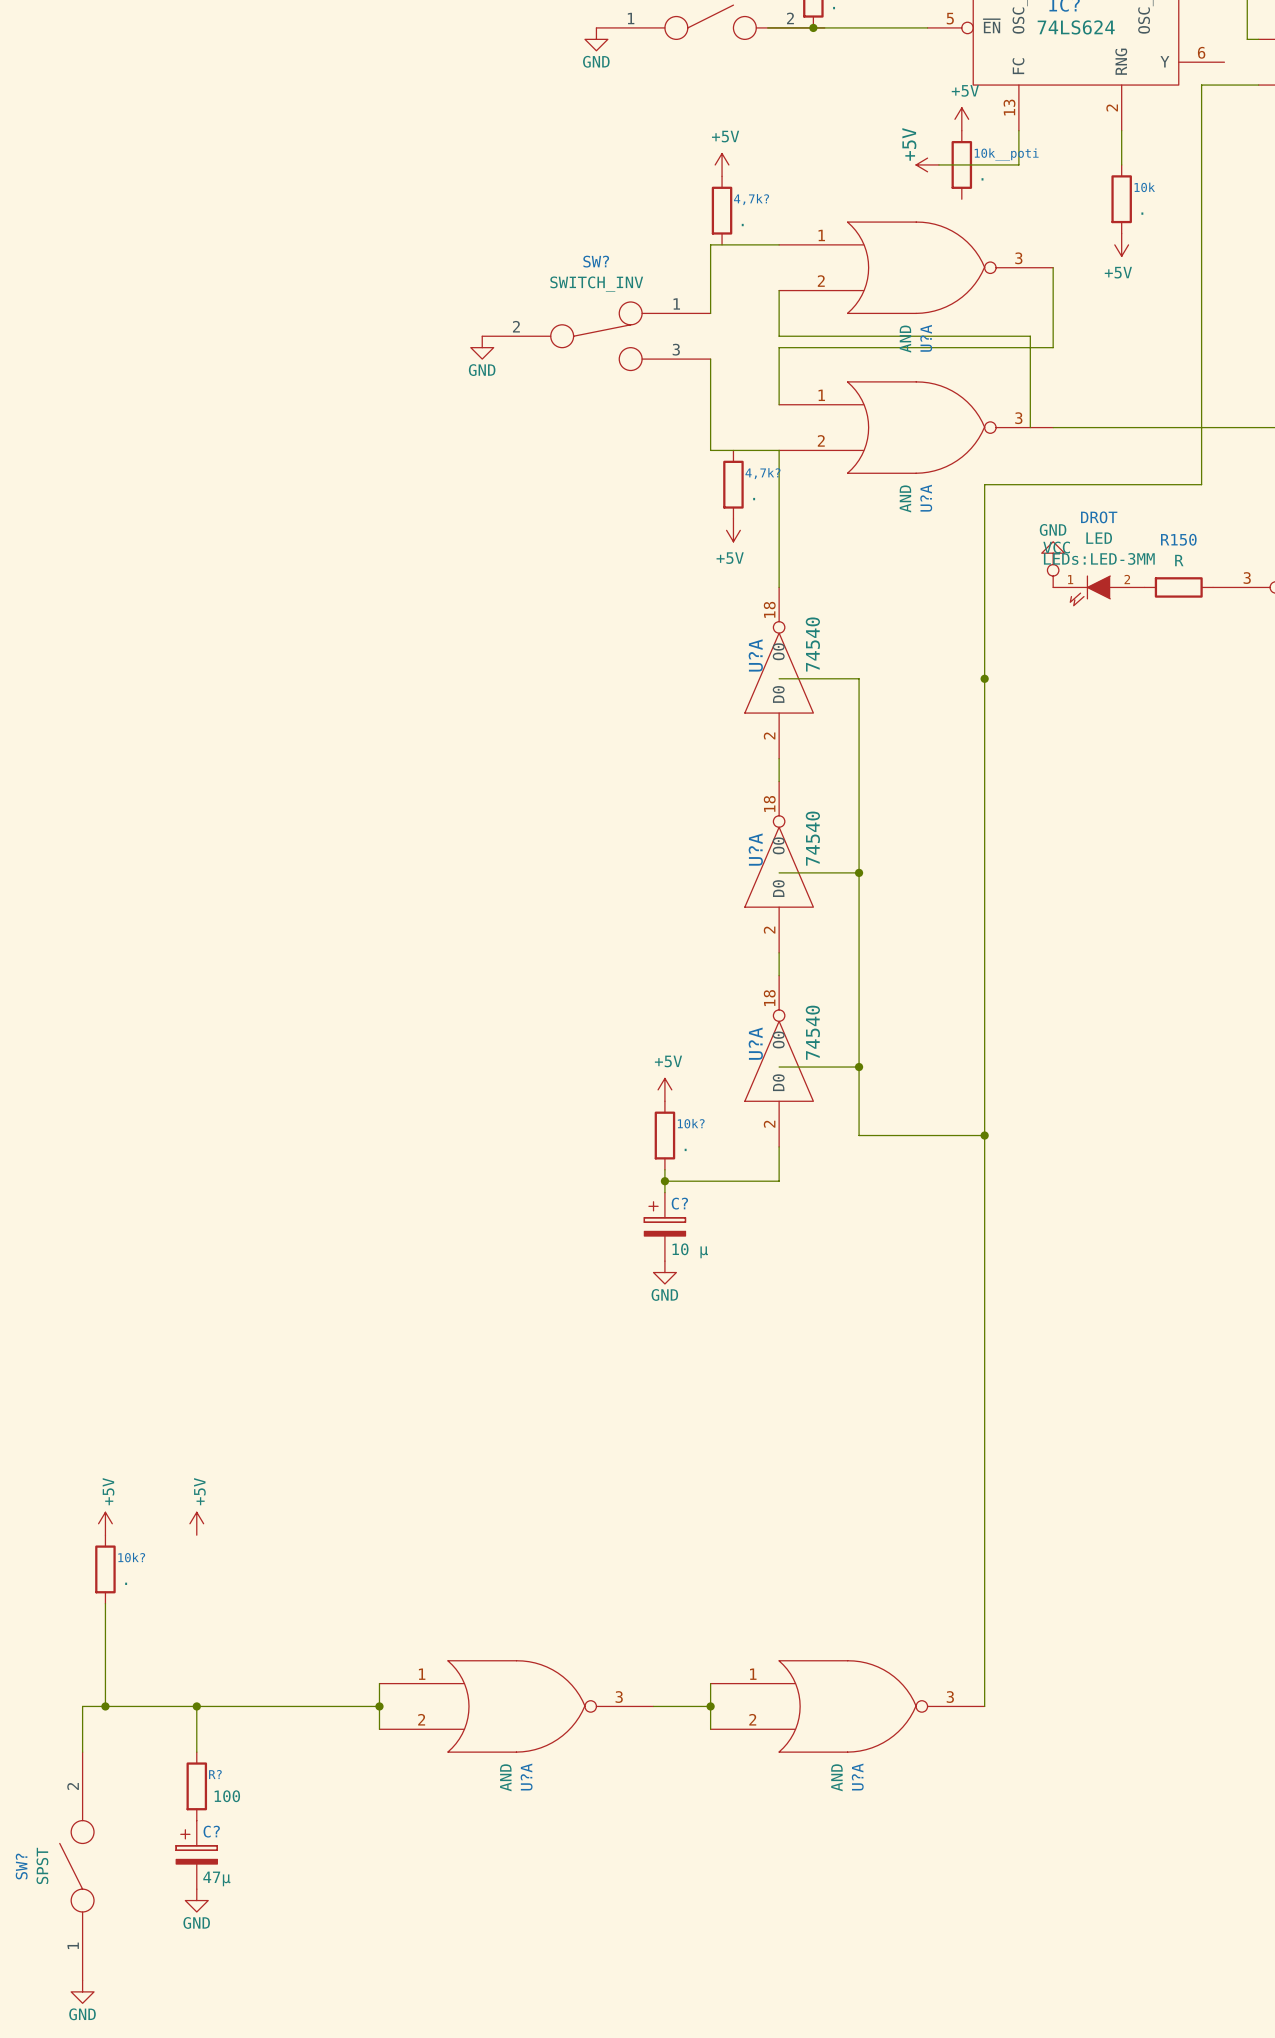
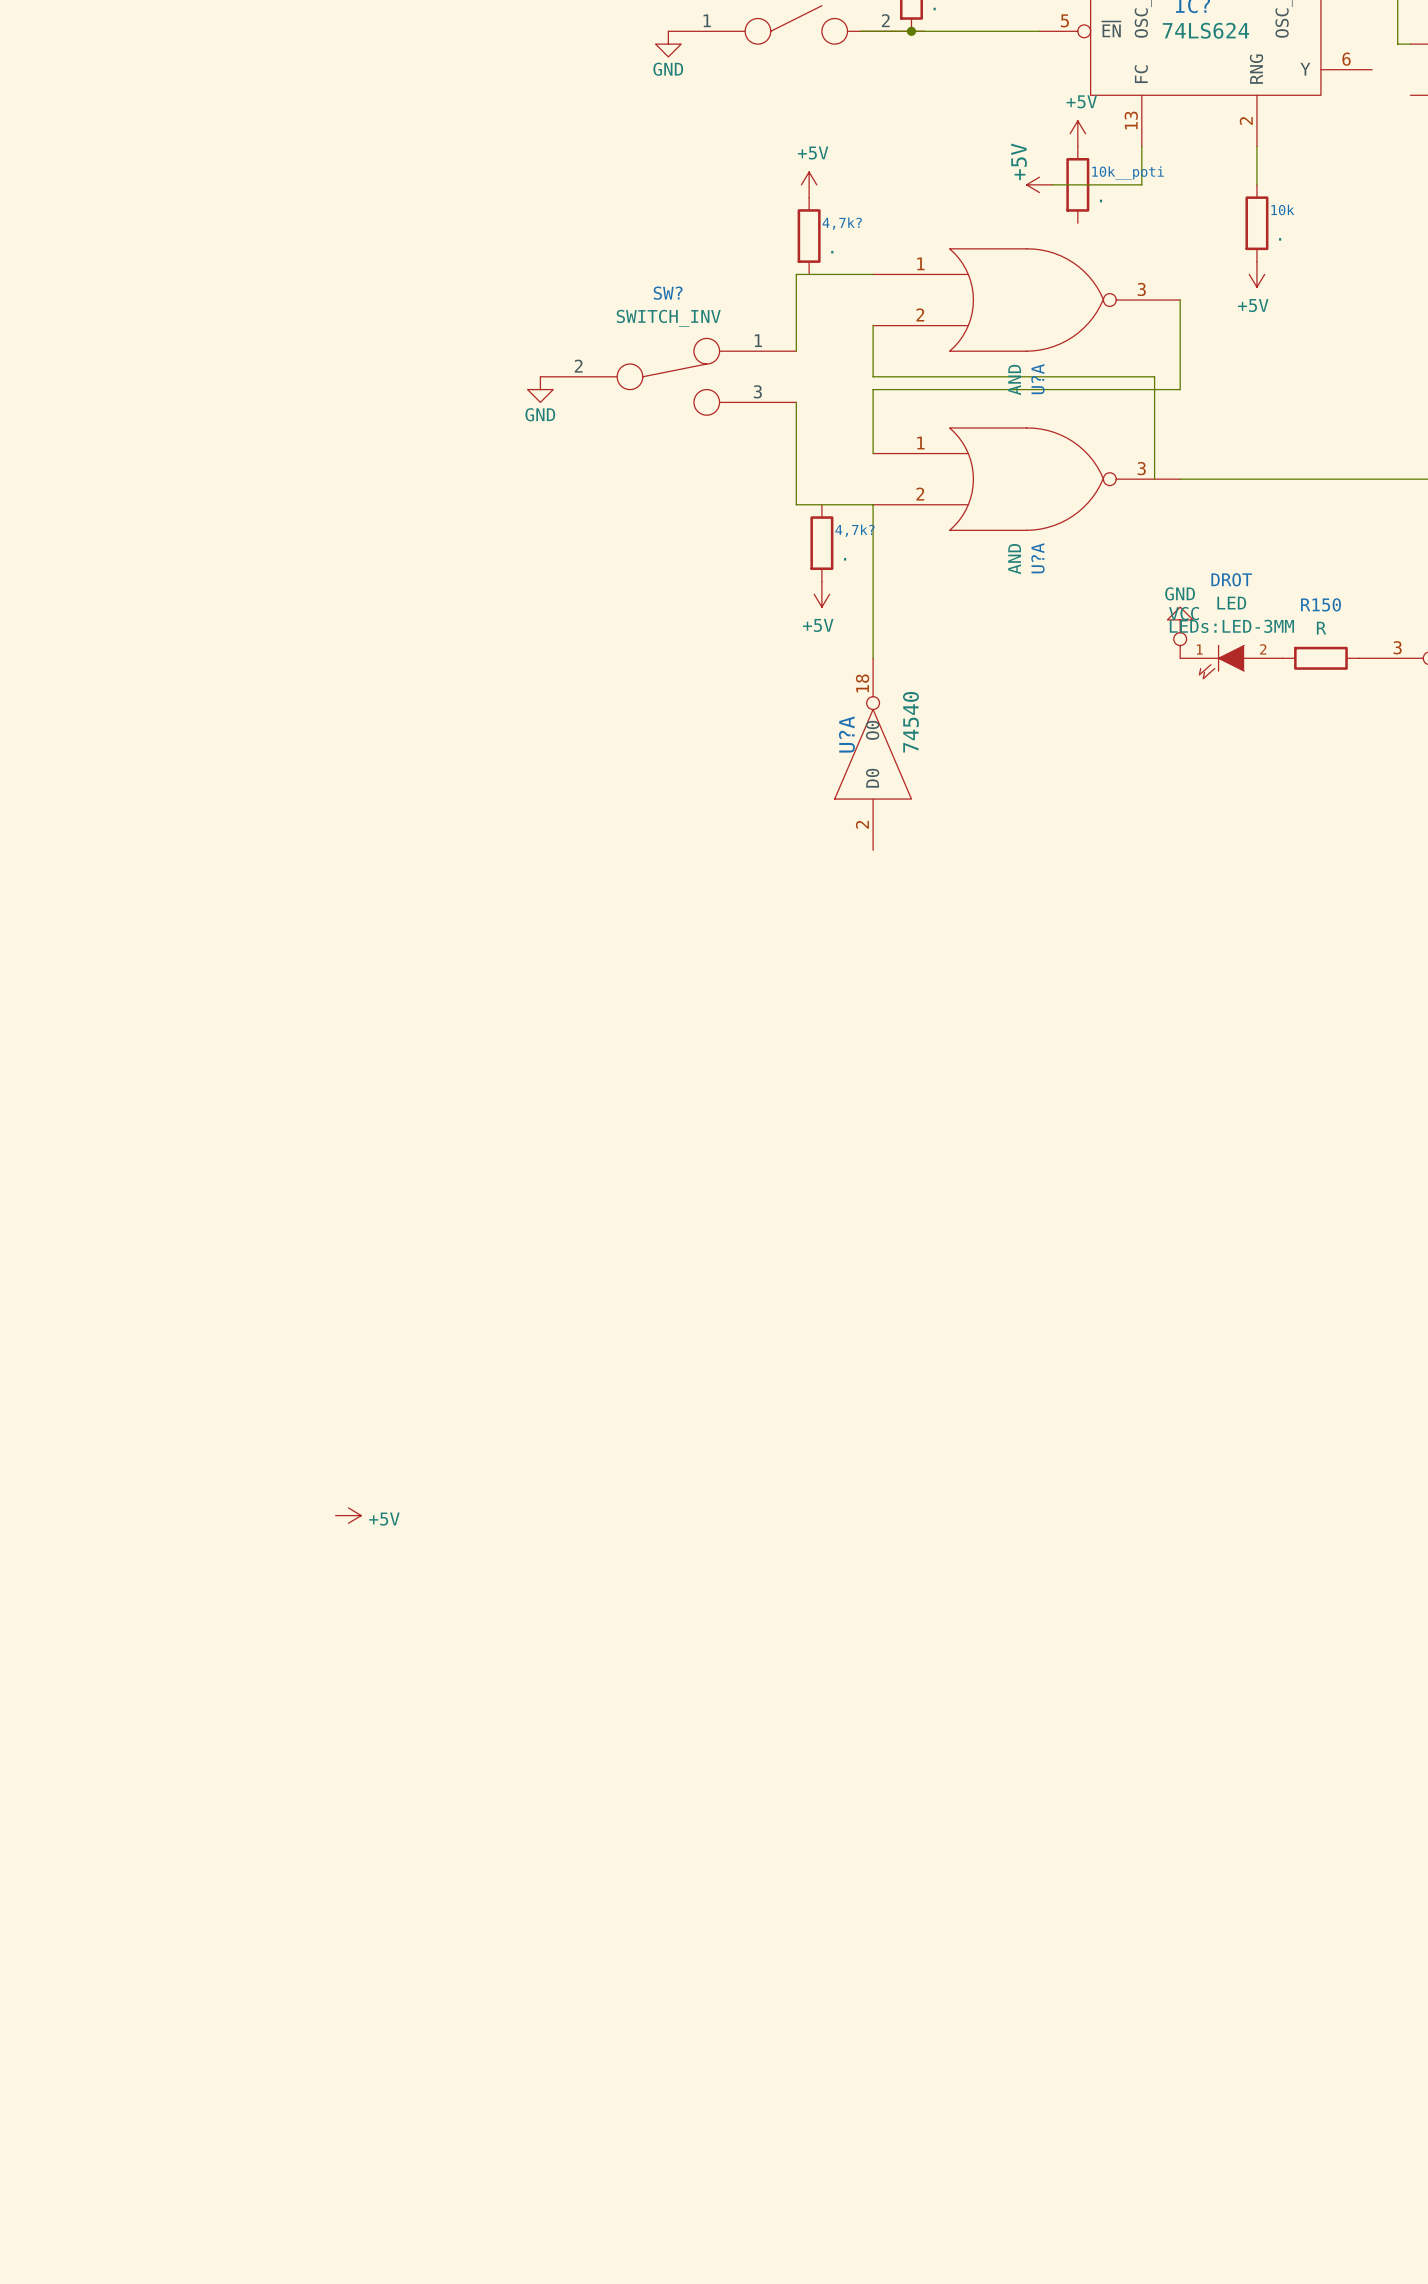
wire: (1258, 85) (1201, 85) (1201, 484) (984, 484) (984, 1706) -> none
wire: (779, 678) (859, 678) (859, 1135) (984, 1135) -> none
junction: (984, 678) -> none
wire: (779, 758) (779, 781) -> none
U?A: 74540 (779, 867) -> none
wire: (779, 872) (859, 872) -> none
junction: (859, 872) -> none
wire: (779, 952) (779, 975) -> none
U?A: 74540 (779, 1061) -> none
wire: (779, 1067) (859, 1067) -> none
junction: (859, 1067) -> none
power symbol: +5V (664, 1089) -> none
10k?: . (664, 1135) -> none
junction: (984, 1135) -> none
wire: (779, 1146) (779, 1181) (664, 1181) -> none
wire: (664, 1169) (664, 1192) -> none
junction: (664, 1181) -> none
C?: 10 µ (664, 1226) -> none
power symbol: GND (664, 1272) -> none
power symbol: none -> +5V (348, 1515)
power symbol: +5V (105, 1523) -> none
power symbol: +5V (196, 1523) -> none
10k?: . (105, 1569) -> none
wire: (105, 1603) (105, 1706) -> none
wire: (379, 1683) (379, 1729) -> none
wire: (710, 1683) (710, 1729) -> none
junction: (105, 1706) -> none
wire: (196, 1706) (196, 1752) -> none
junction: (196, 1706) -> none
wire: (379, 1706) (82, 1706) (82, 1752) -> none
junction: (379, 1706) -> none
U?A: AND (516, 1706) -> none
wire: (653, 1706) (710, 1706) -> none
junction: (710, 1706) -> none
U?A: AND (847, 1706) -> none
R?: 100 (196, 1786) -> none
C?: 47µ (196, 1854) -> none
SW?: SPST (76, 1866) -> none
power symbol: GND (196, 1900) -> none
power symbol: GND (82, 1991) -> none

